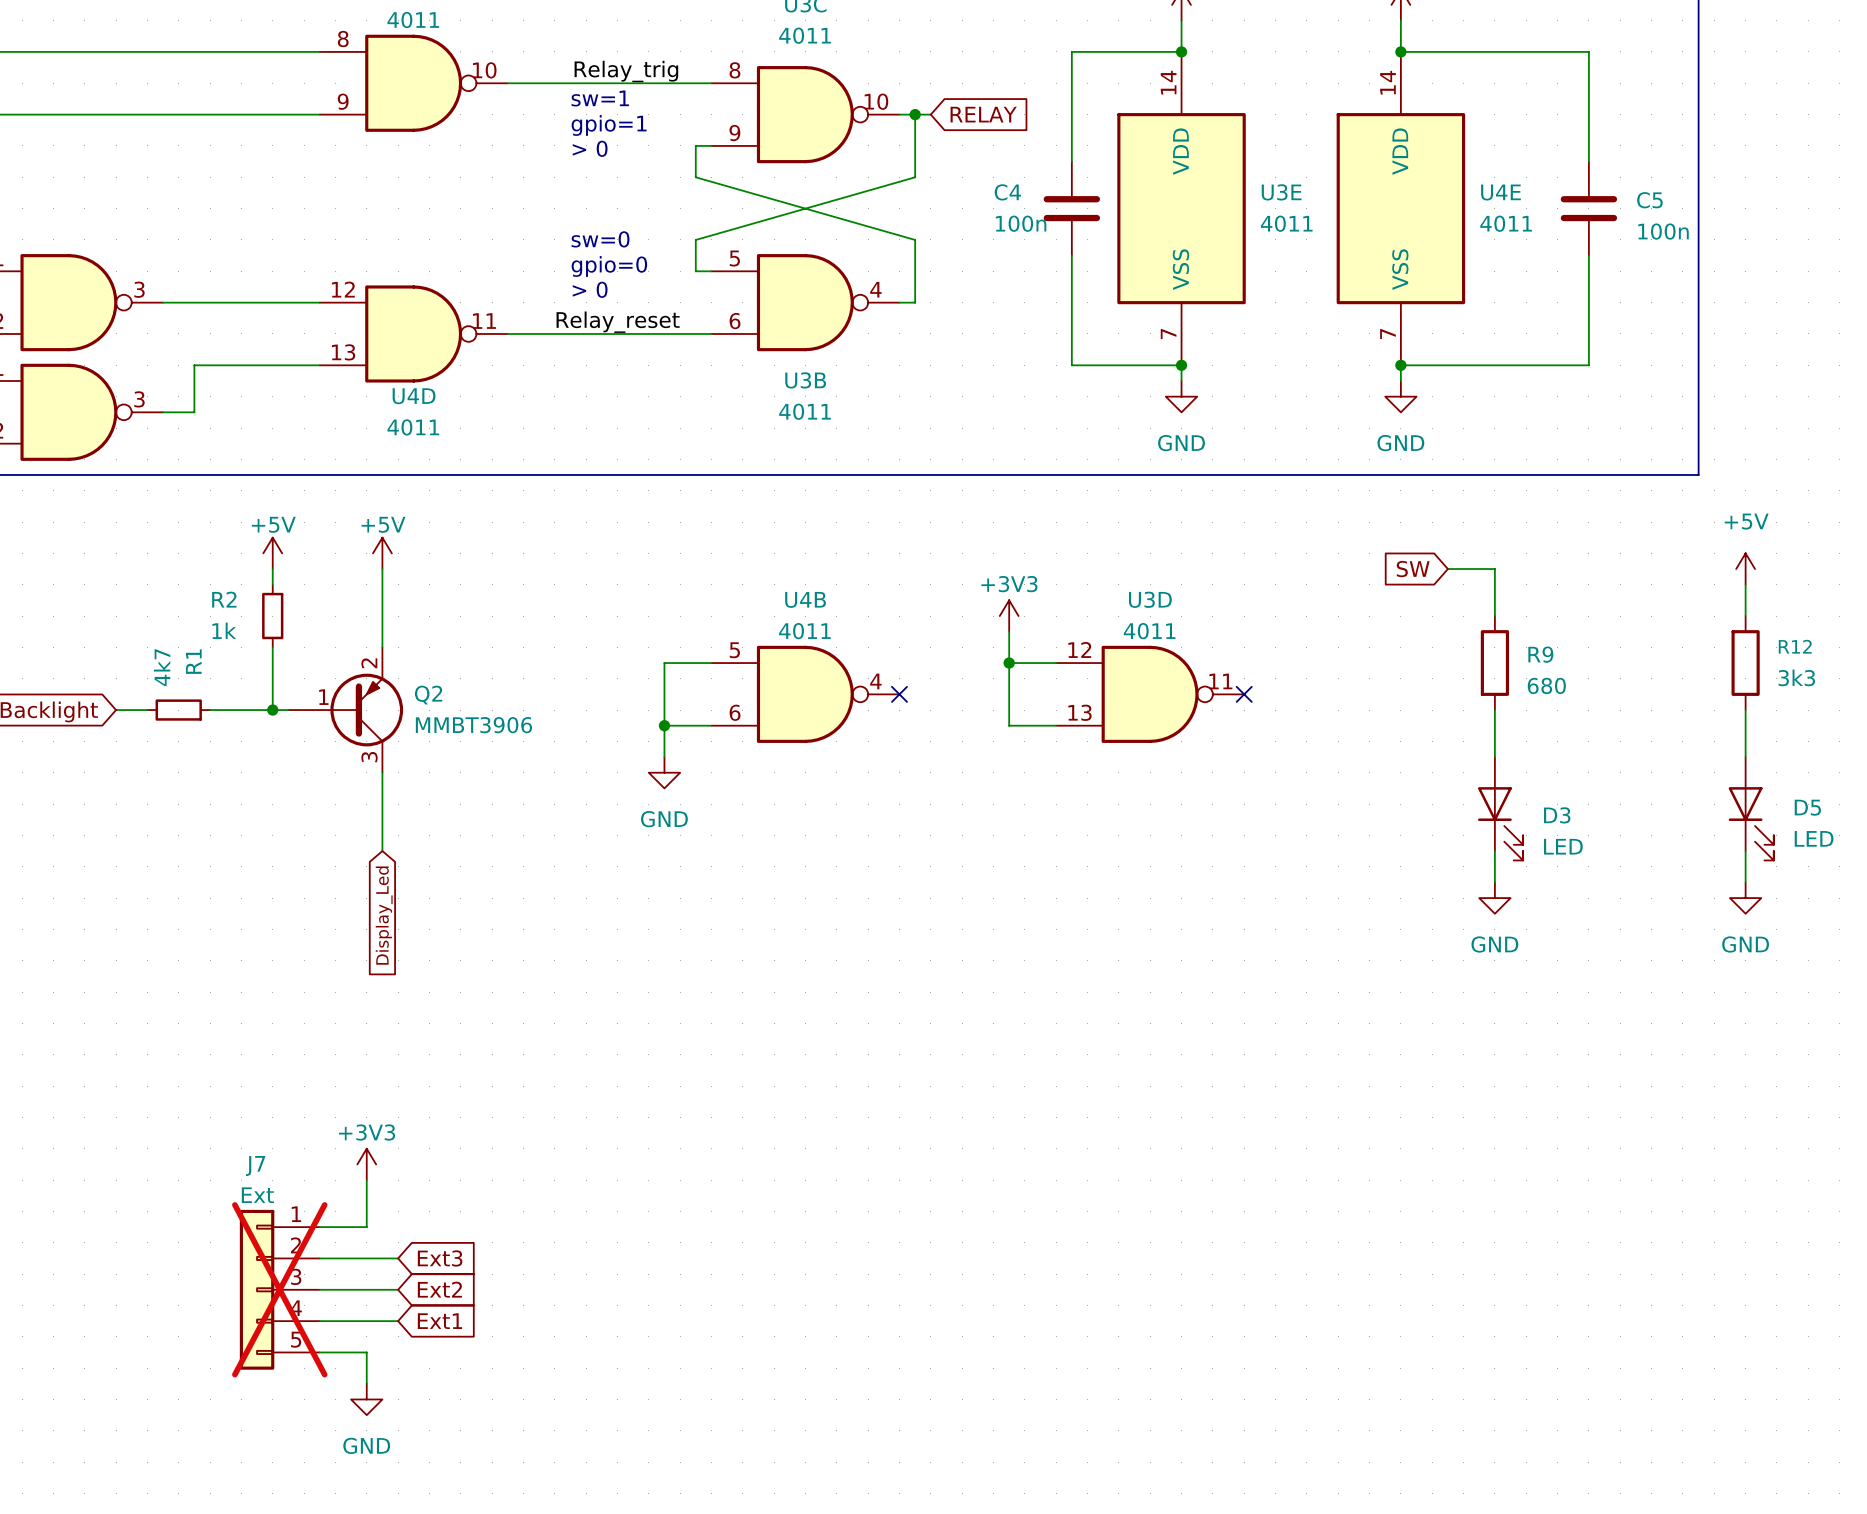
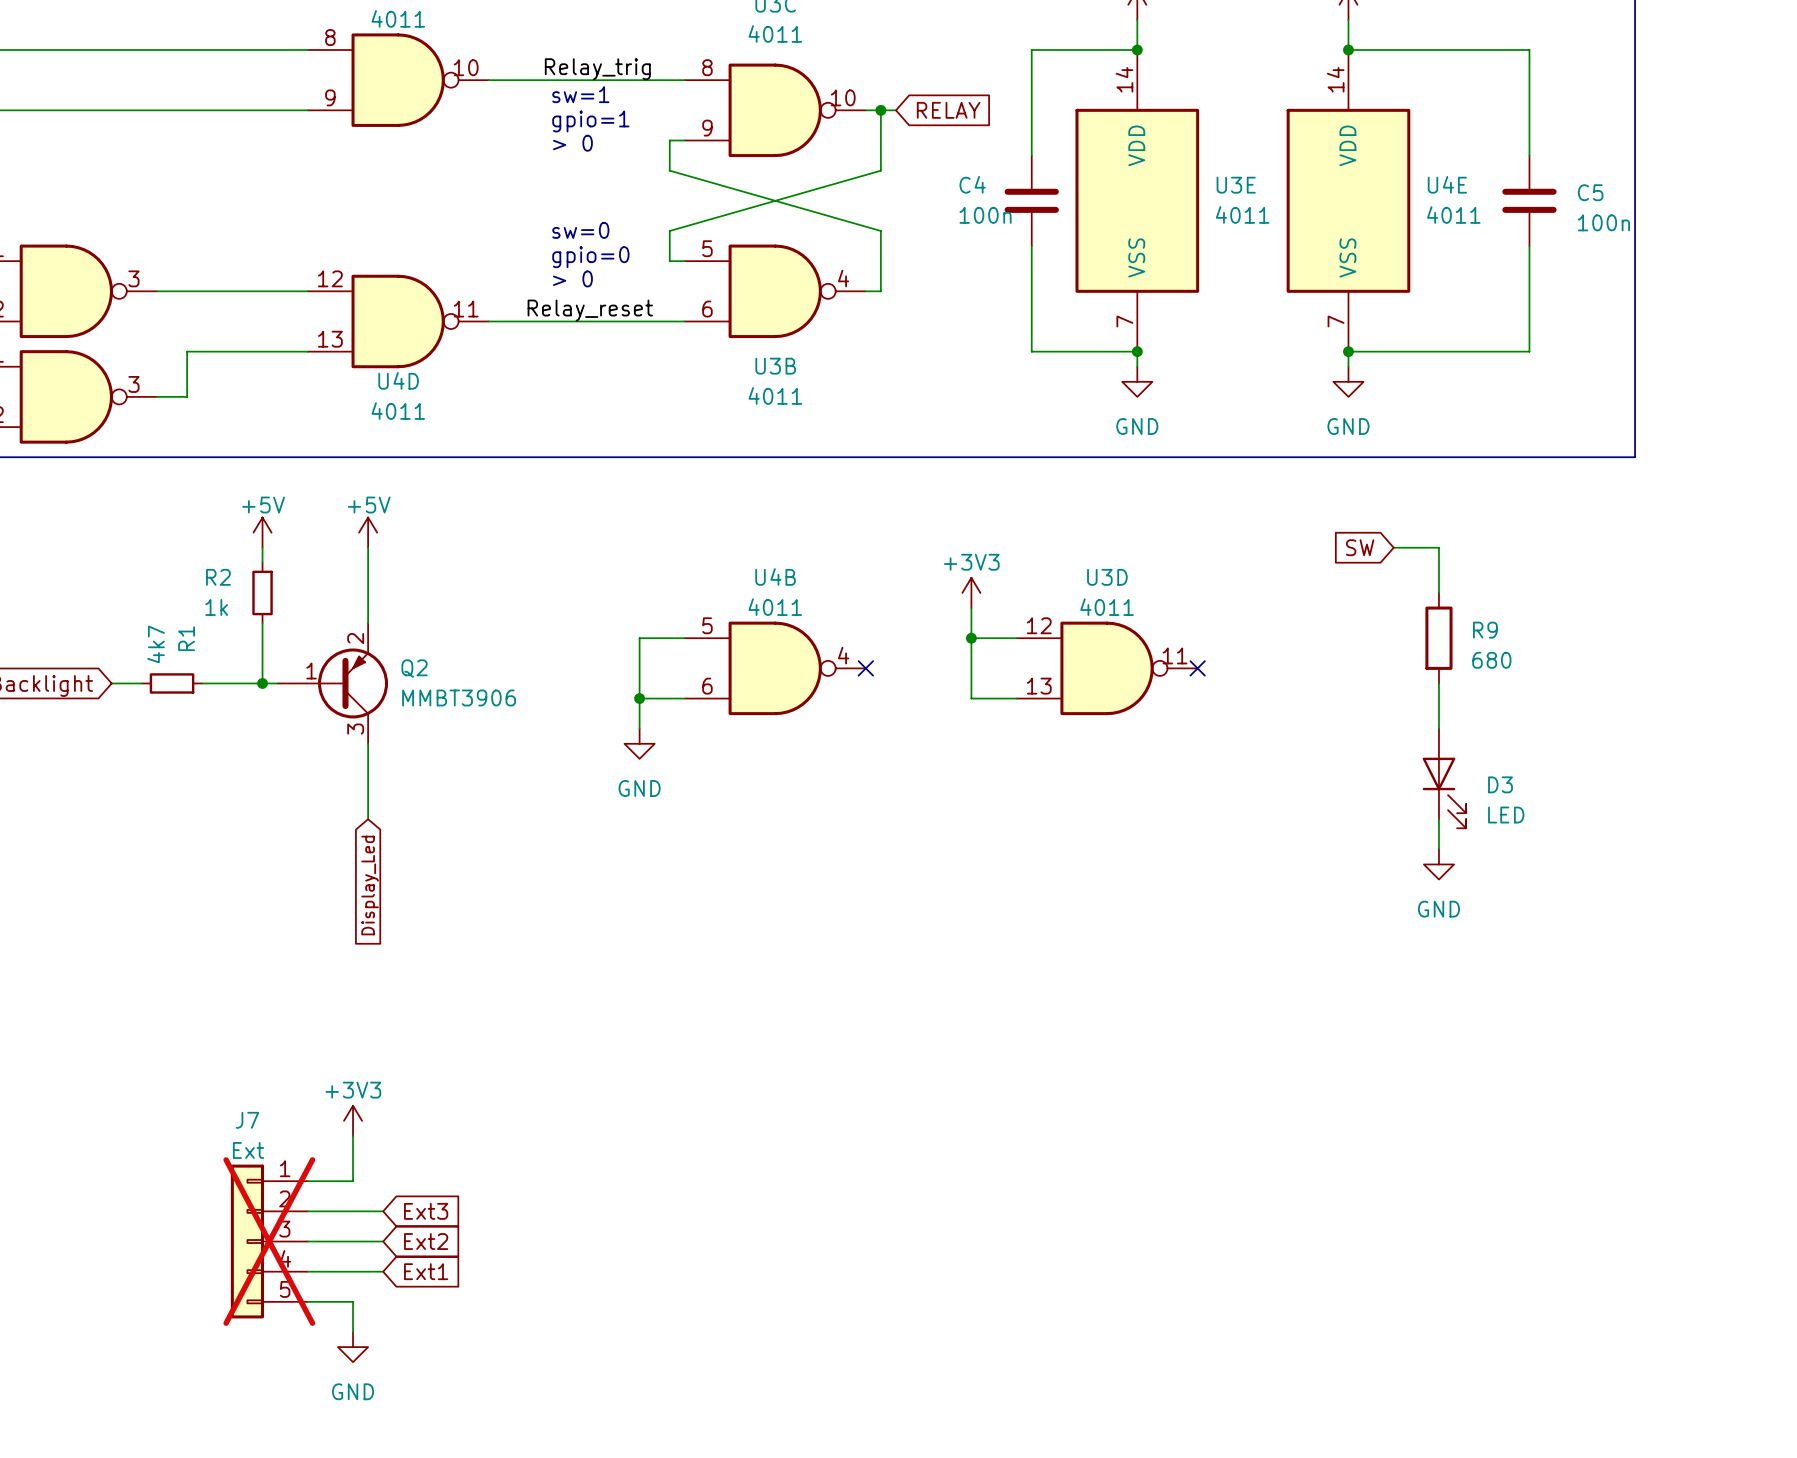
power symbol: +5V (1745, 569) -> none
wire: (1745, 584) (1745, 616) -> none
R12: 3k3 (1745, 663) -> none
wire: (1745, 710) (1745, 757) -> none
D5: LED (1751, 808) -> none
wire: (1745, 851) (1745, 882) -> none
power symbol: GND (1745, 898) -> none

